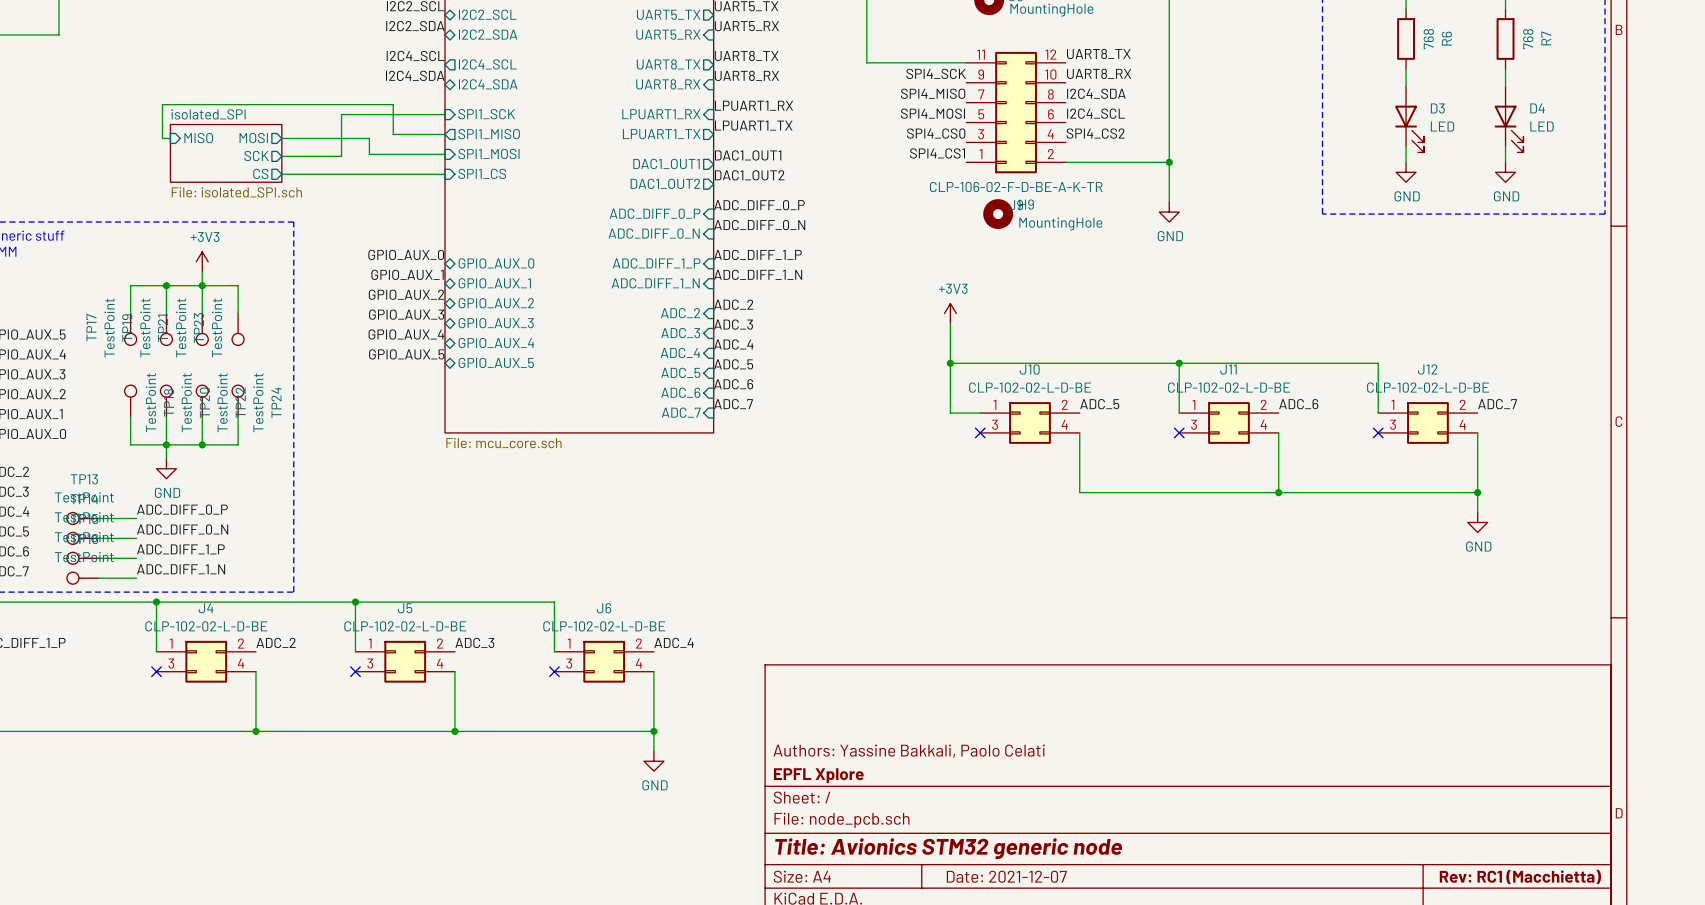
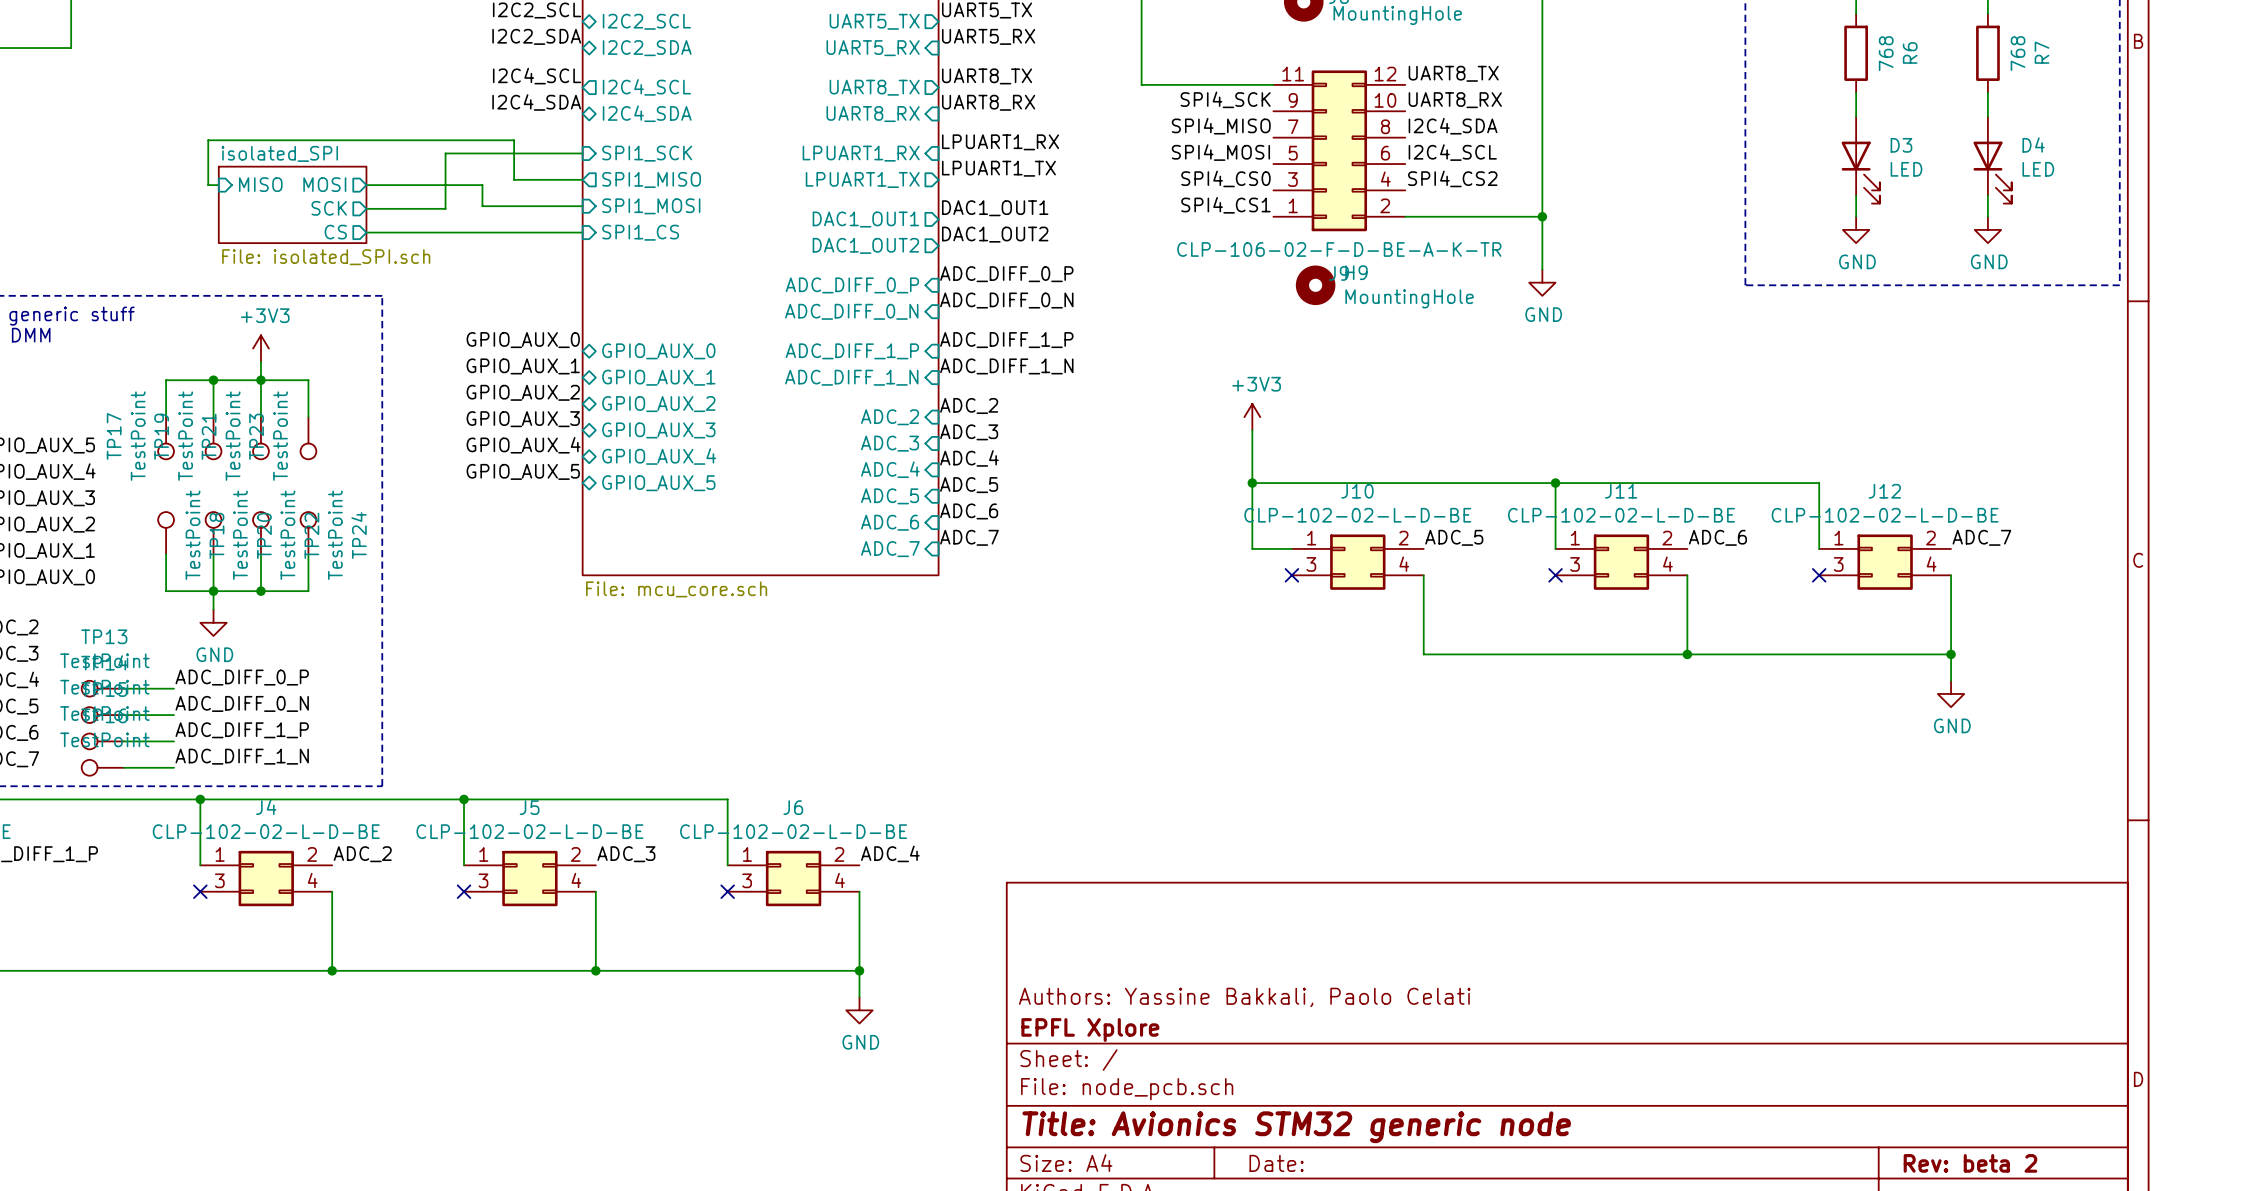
title block: Date: 2021-12-07 (1006, 876) -> Date: (1276, 1163)
title block: Rev: RC1 (Macchietta) (1520, 877) -> Rev: beta 2 (1970, 1163)

